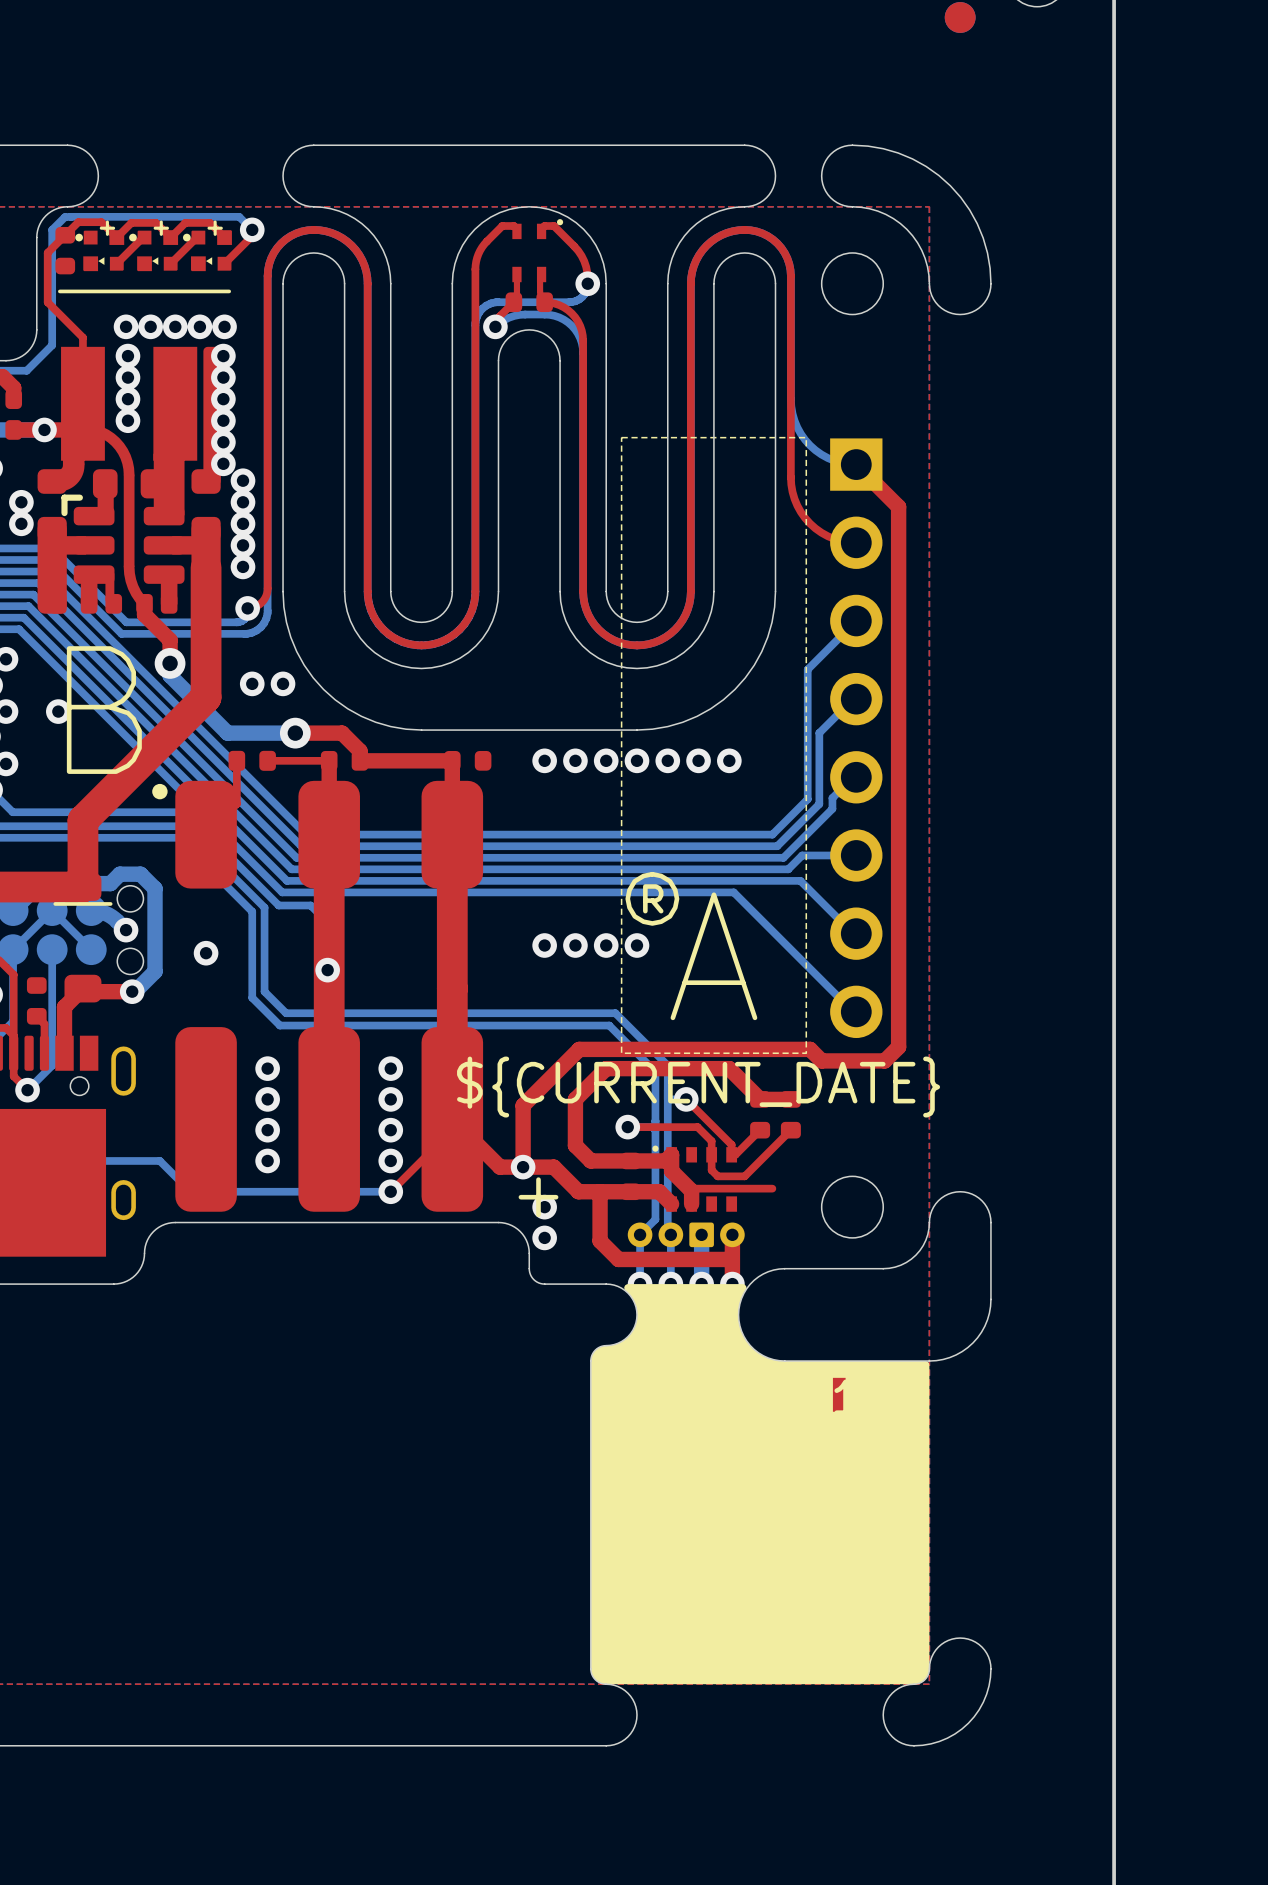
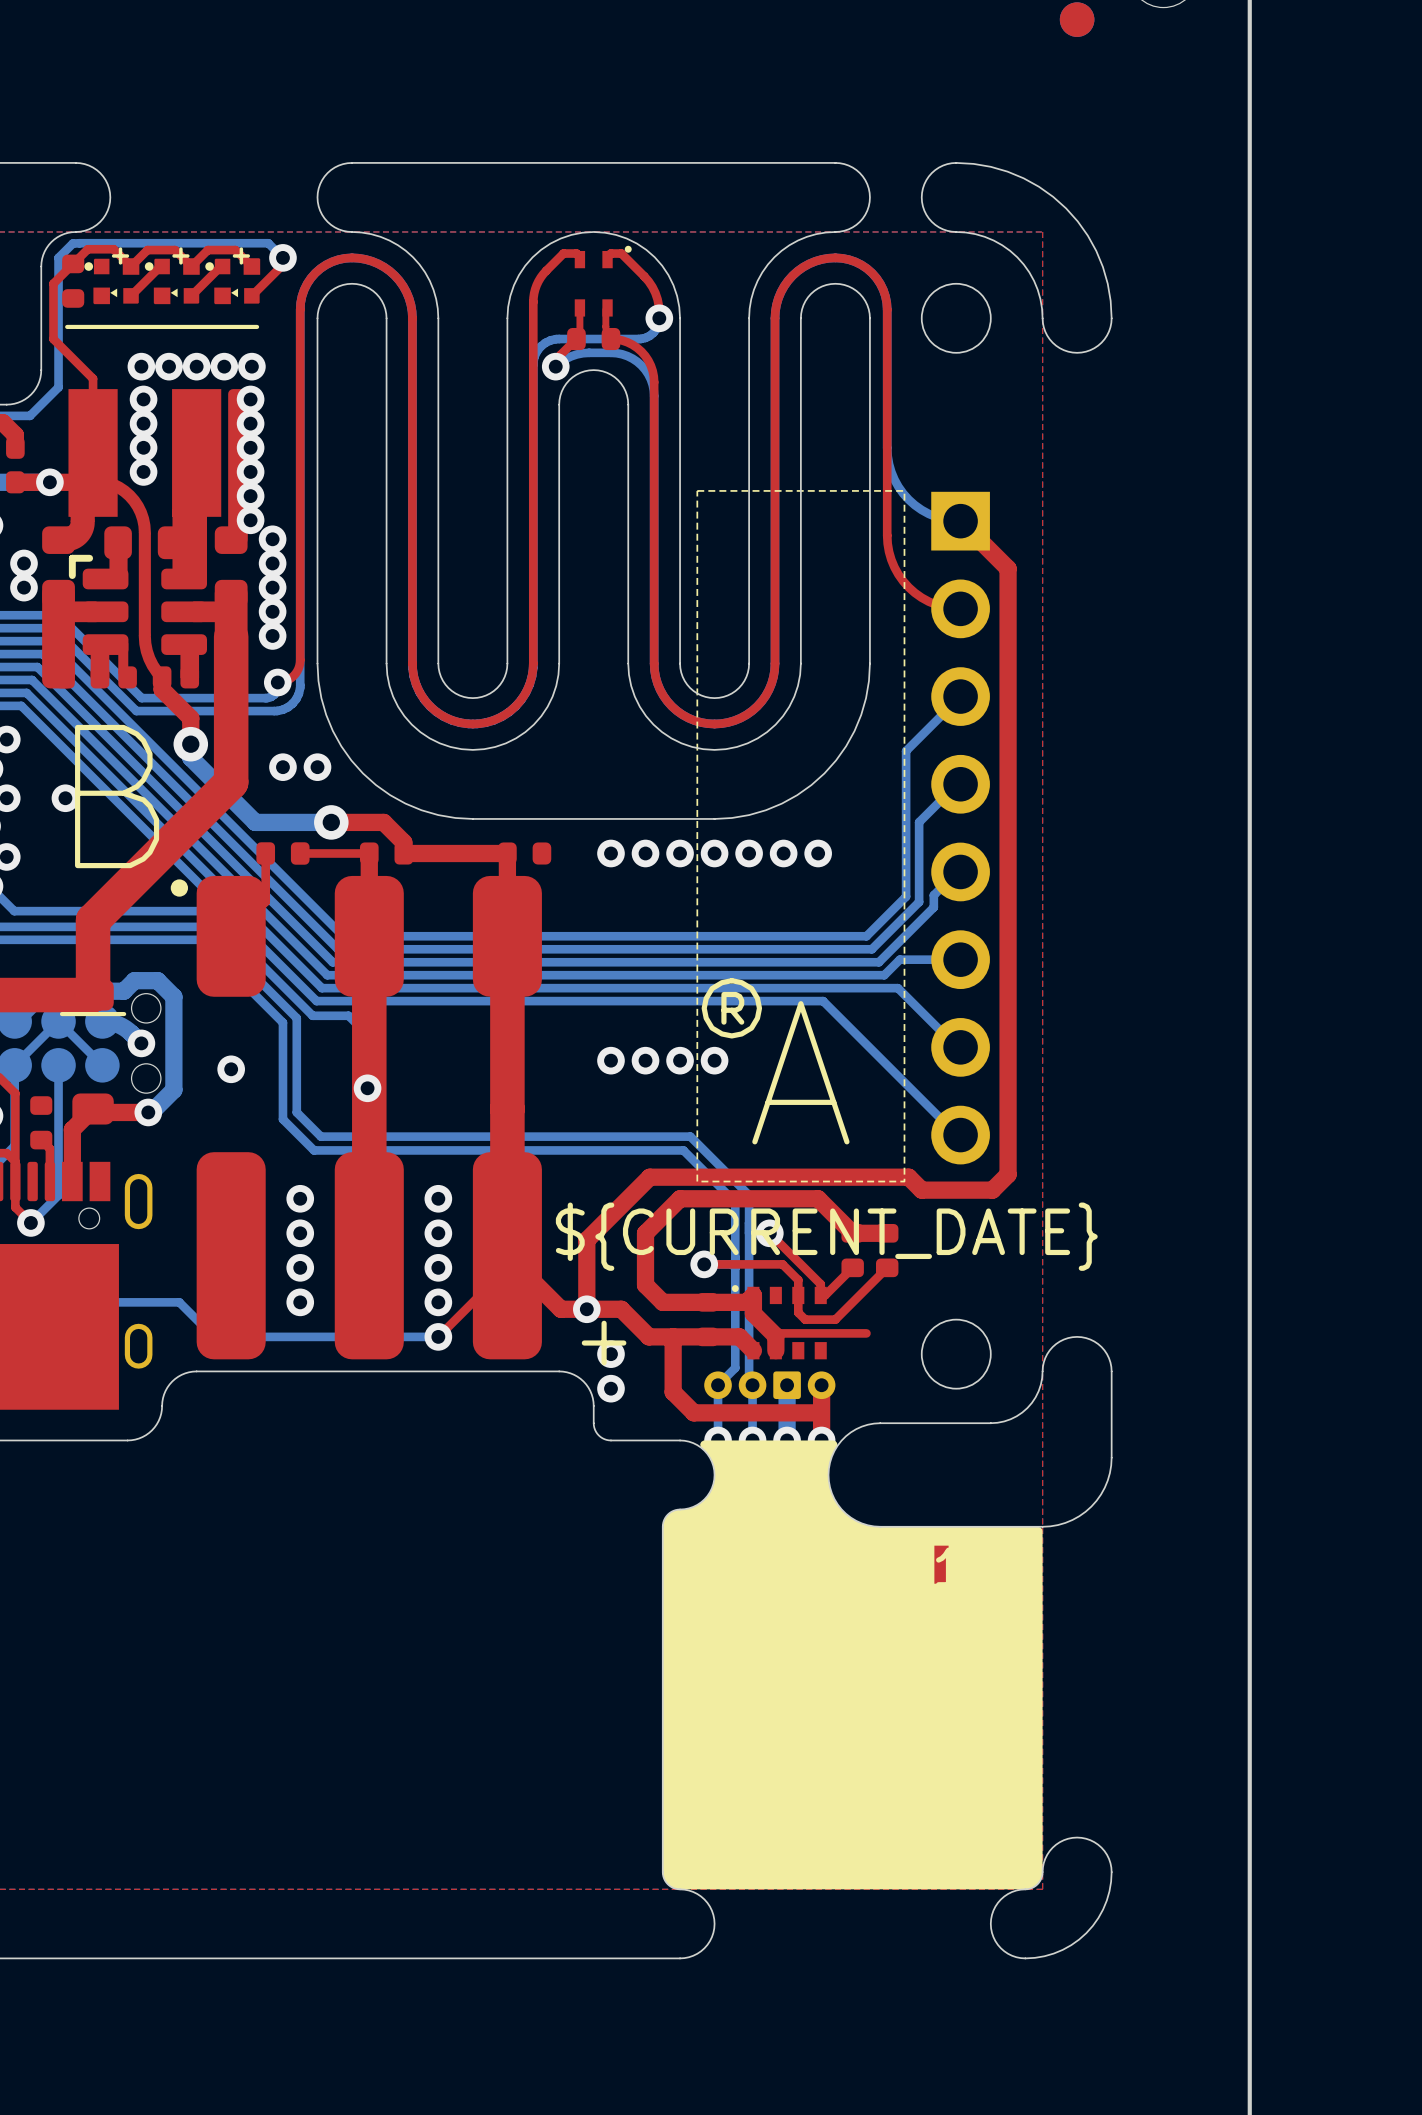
text position: ${CURRENT_DATE} (698, 1087) -> ${CURRENT_DATE} (826, 1236)

